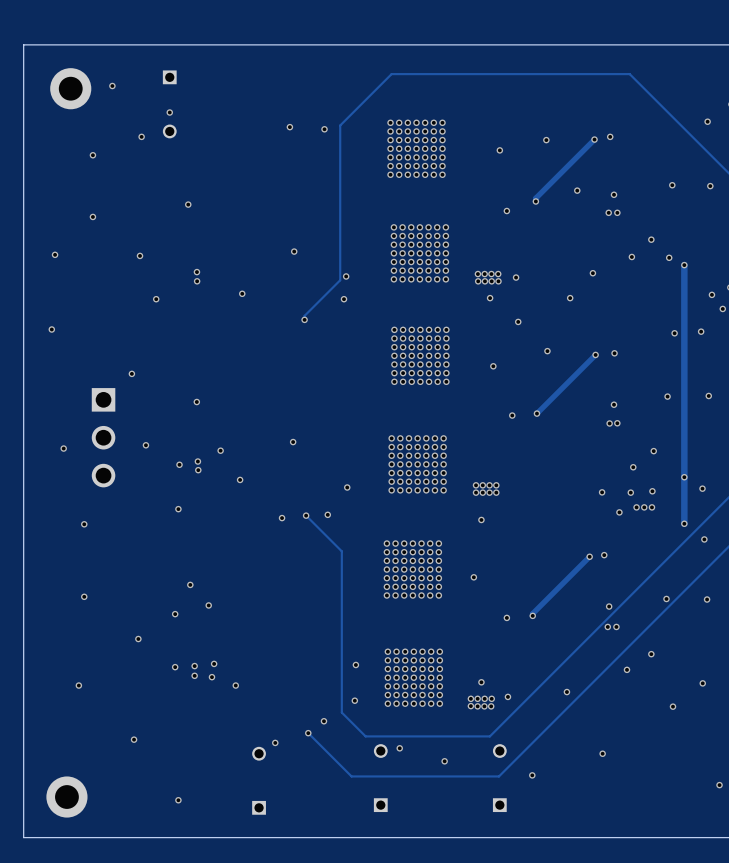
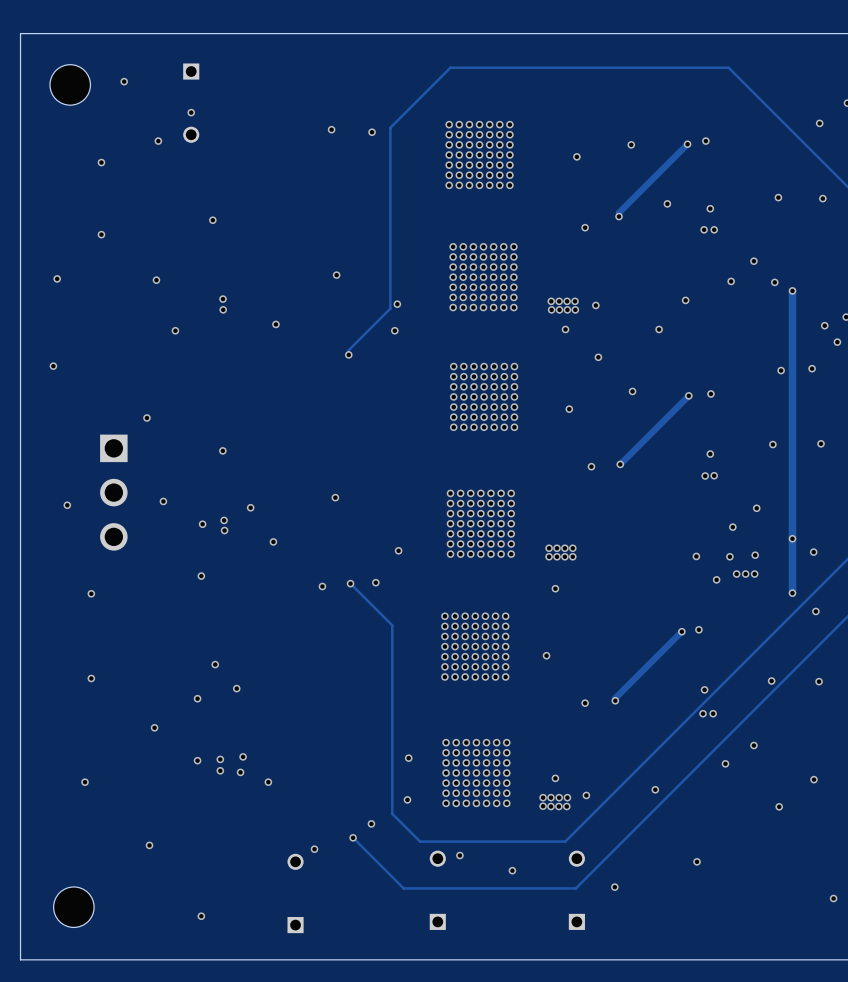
part footprint: [50, 68, 92, 110] -> [49, 64, 91, 106]
part footprint: [46, 776, 88, 818] -> [53, 886, 95, 928]

